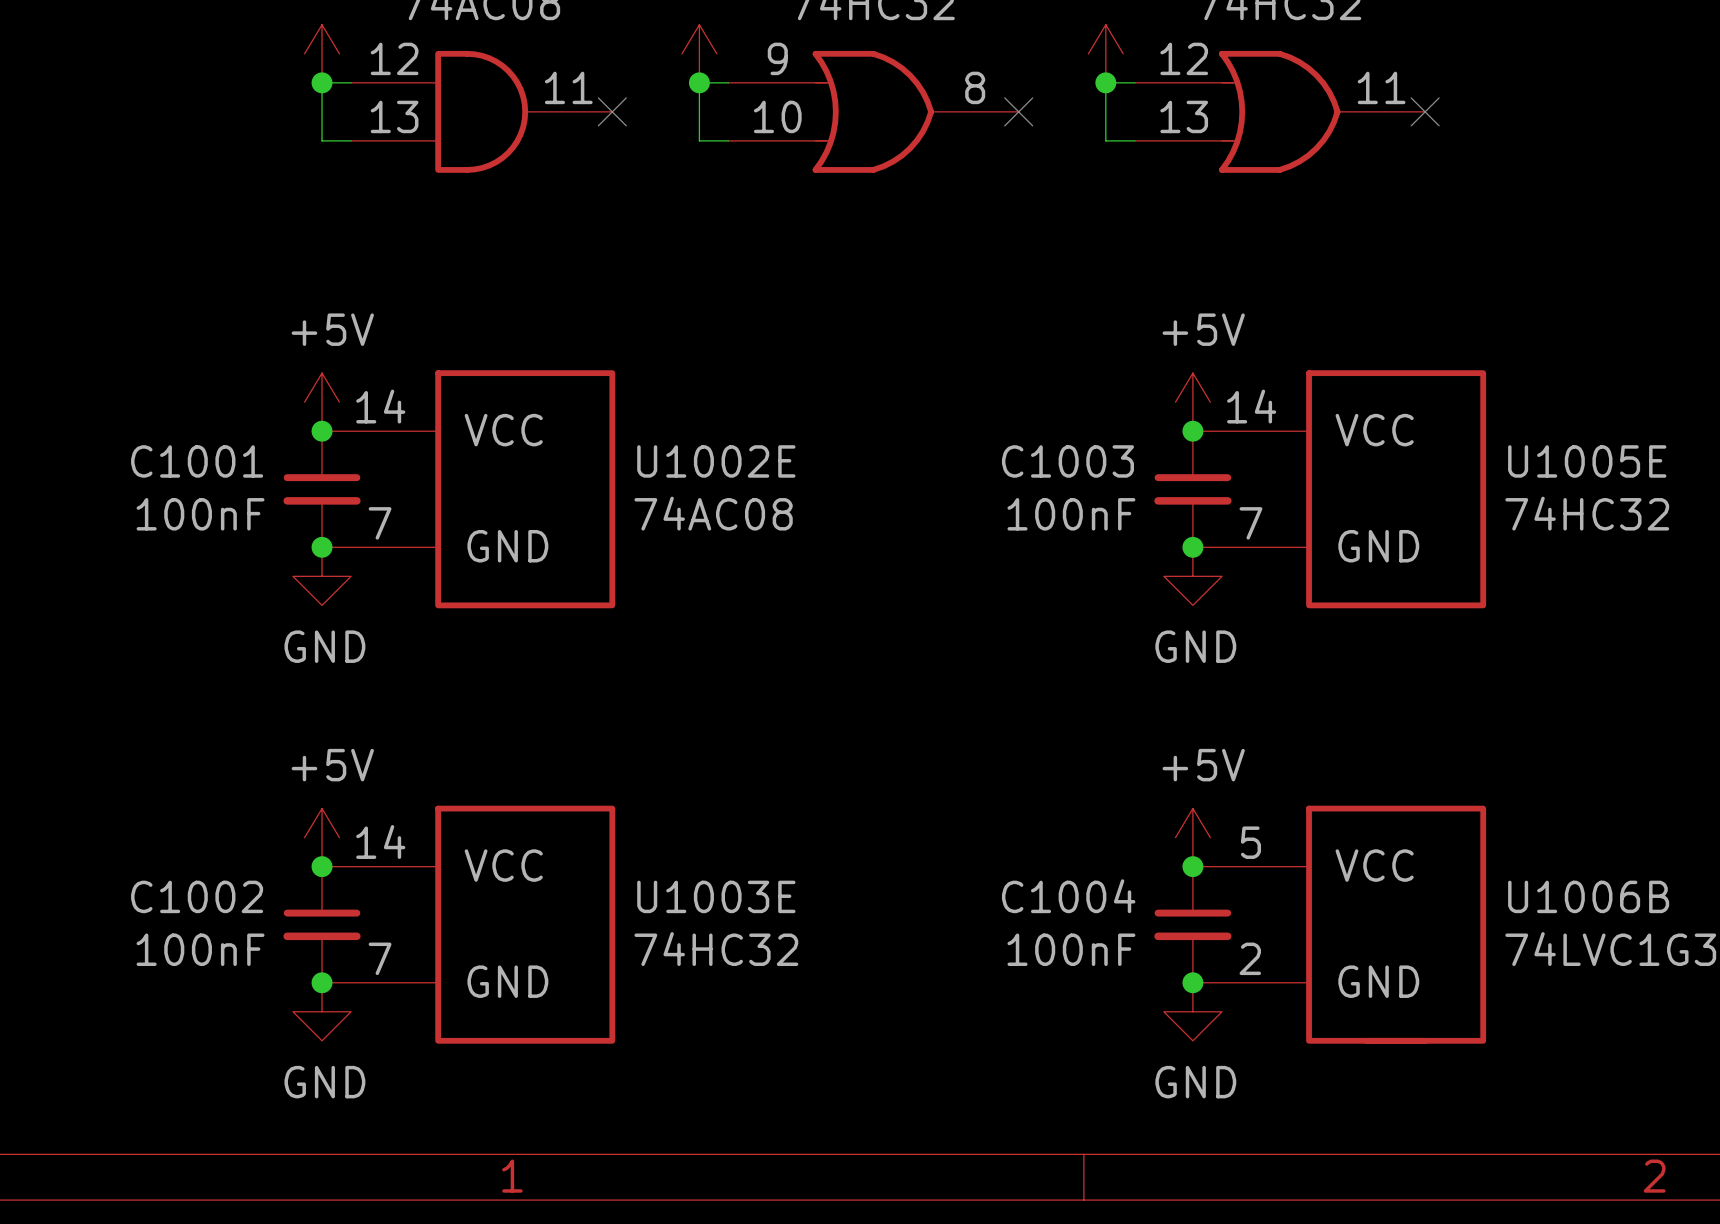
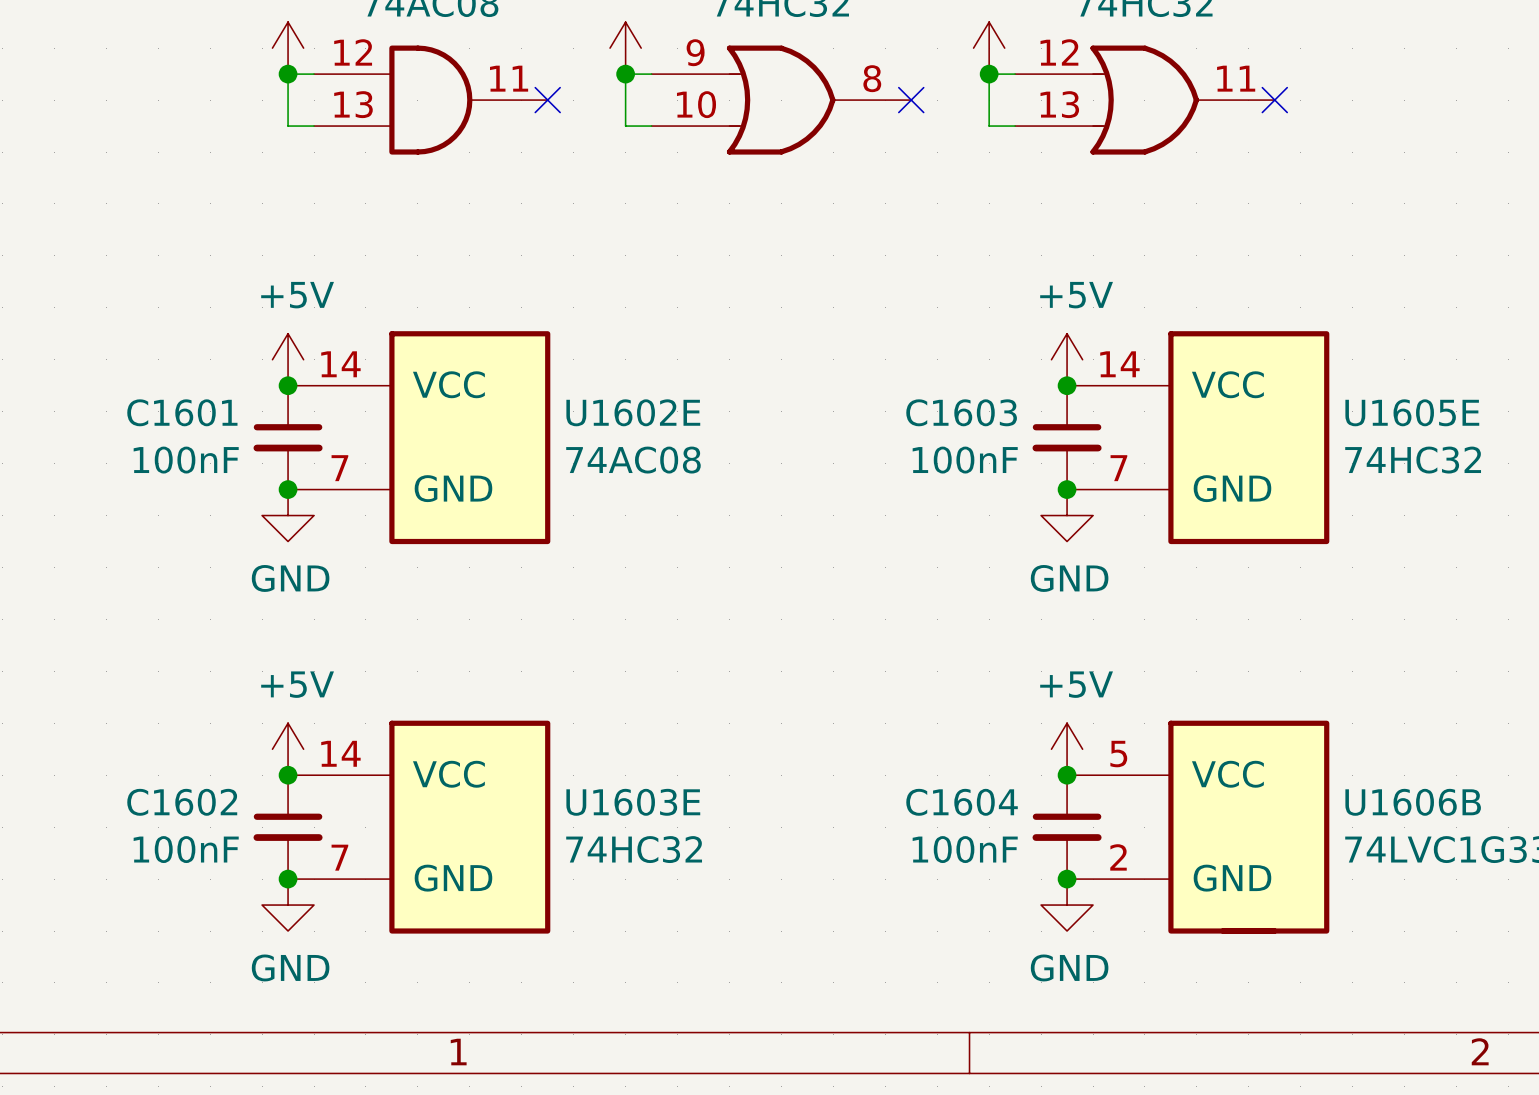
C1001 name: C1001 (197, 461) -> C1601 (182, 412)
U1002E name: U1002E (716, 461) -> U1602E (633, 412)
C1003 name: C1003 (1067, 461) -> C1603 (961, 412)
U1005E name: U1005E (1587, 461) -> U1605E (1412, 412)
C1002 name: C1002 (197, 896) -> C1602 (182, 802)
U1003E name: U1003E (716, 896) -> U1603E (633, 802)
C1004 name: C1004 (1068, 896) -> C1604 (962, 802)
U1006B name: U1006B (1588, 896) -> U1606B (1413, 802)

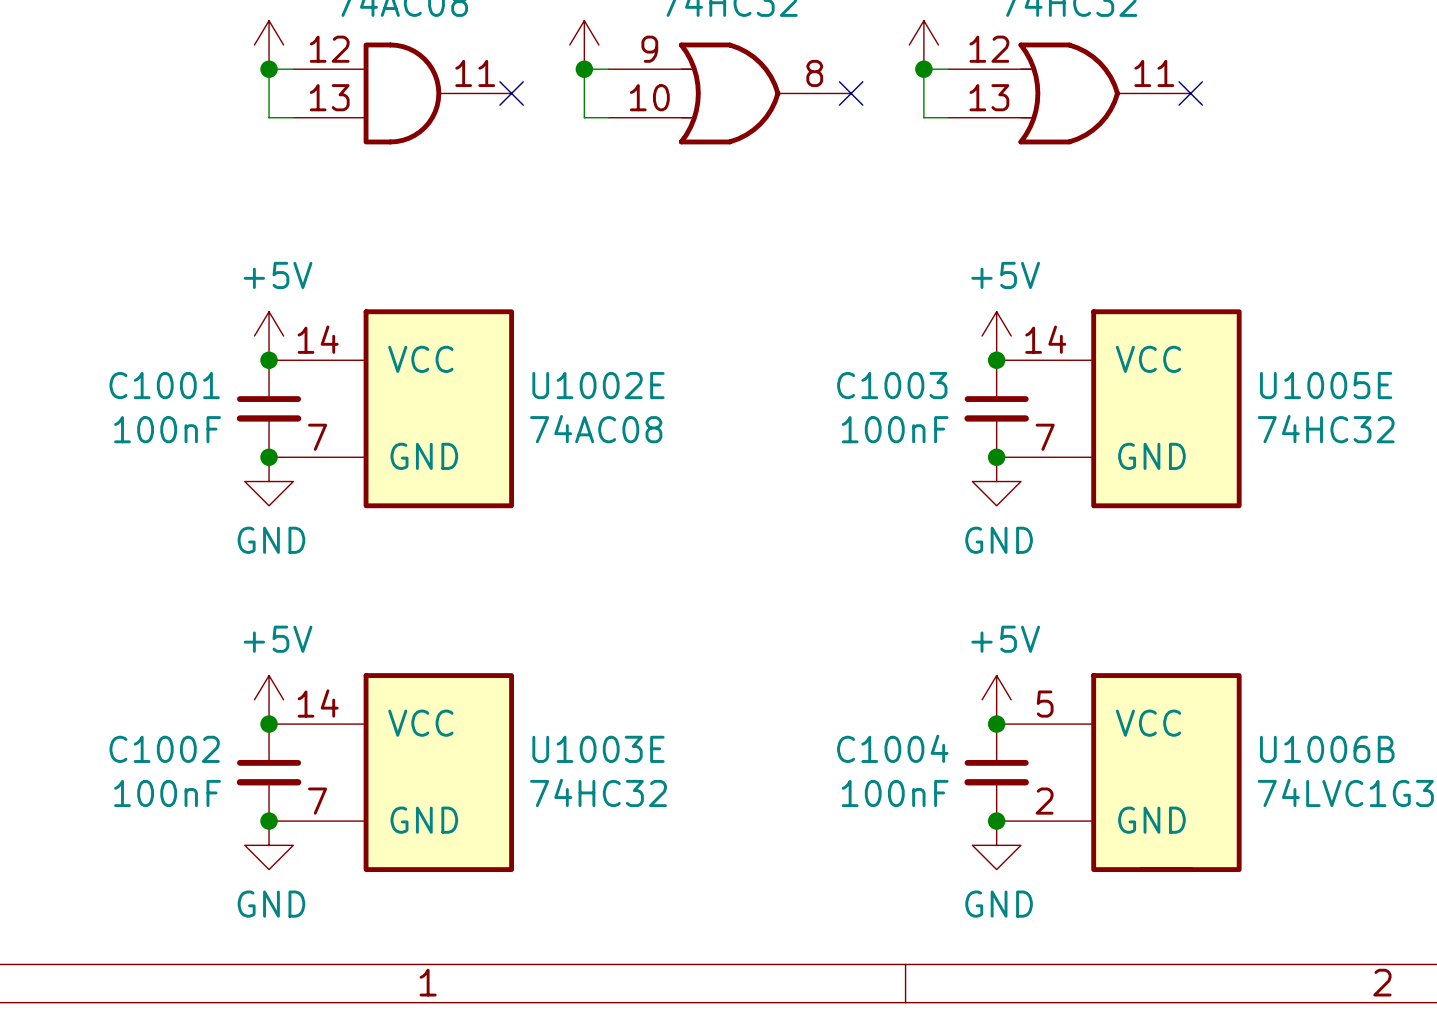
C1601 name: C1601 (182, 412) -> C1001 (164, 385)
U1602E name: U1602E (633, 412) -> U1002E (598, 385)
C1603 name: C1603 (961, 412) -> C1003 (892, 385)
U1605E name: U1605E (1412, 412) -> U1005E (1326, 385)
C1602 name: C1602 (182, 802) -> C1002 (164, 749)
U1603E name: U1603E (633, 802) -> U1003E (598, 749)
C1604 name: C1604 (962, 802) -> C1004 (892, 748)
U1606B name: U1606B (1413, 802) -> U1006B (1327, 749)

